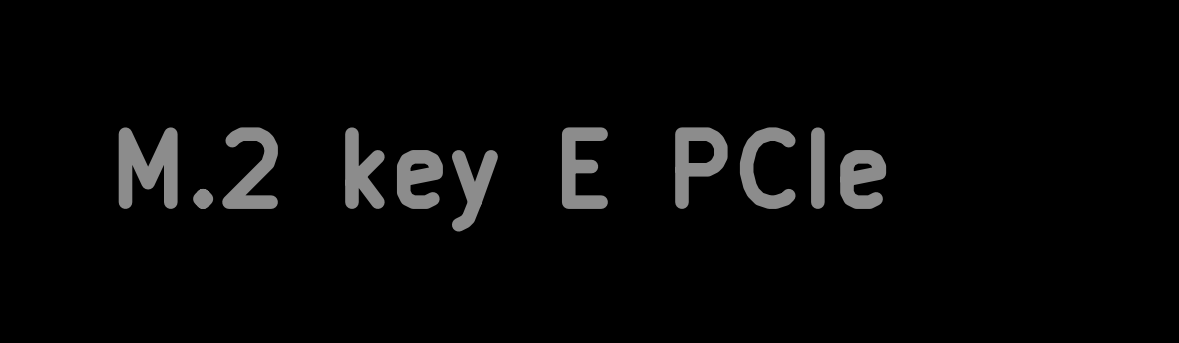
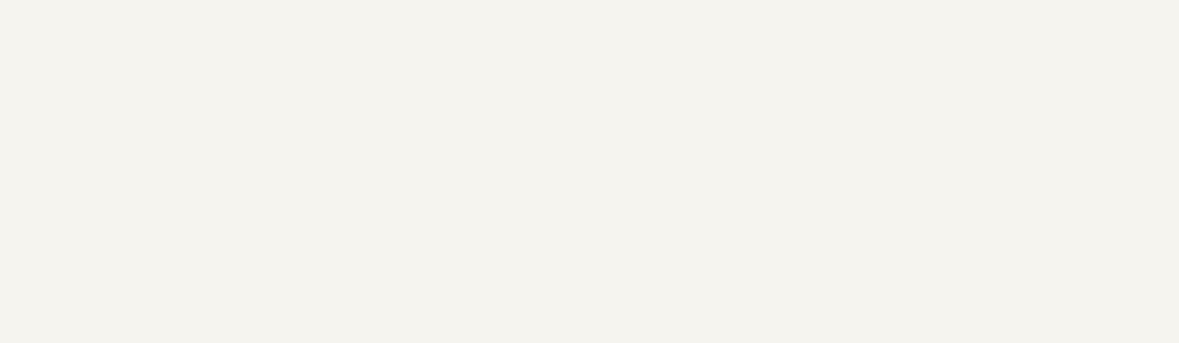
text: M.2 key E PCIe (502, 179) -> none

